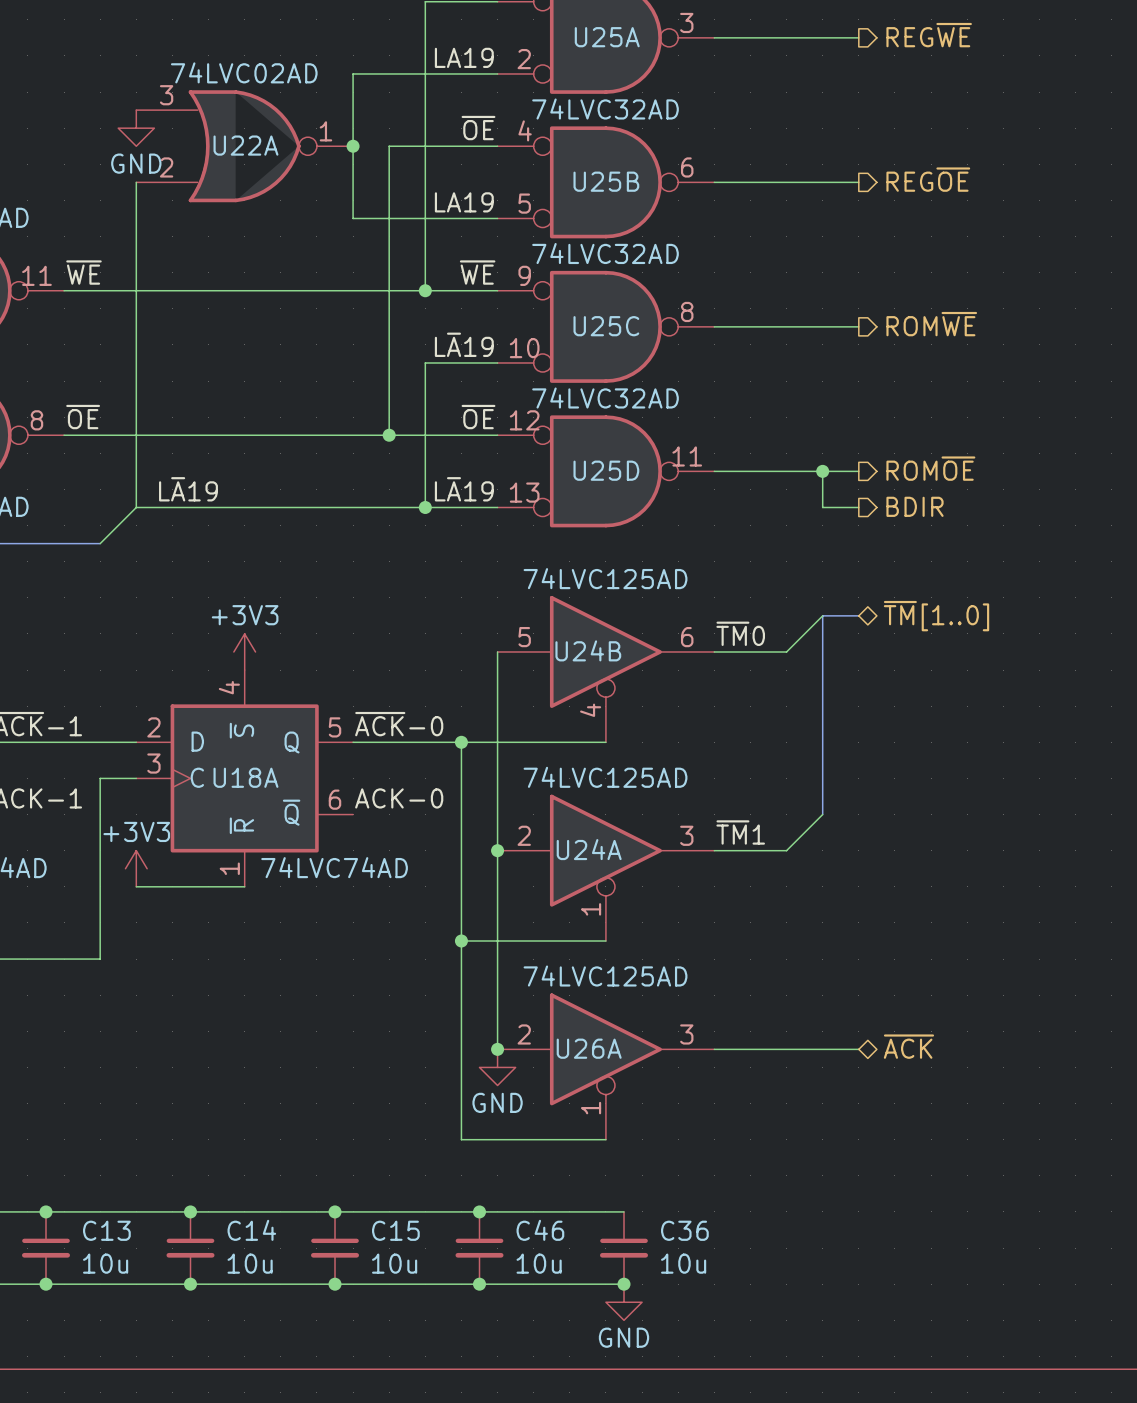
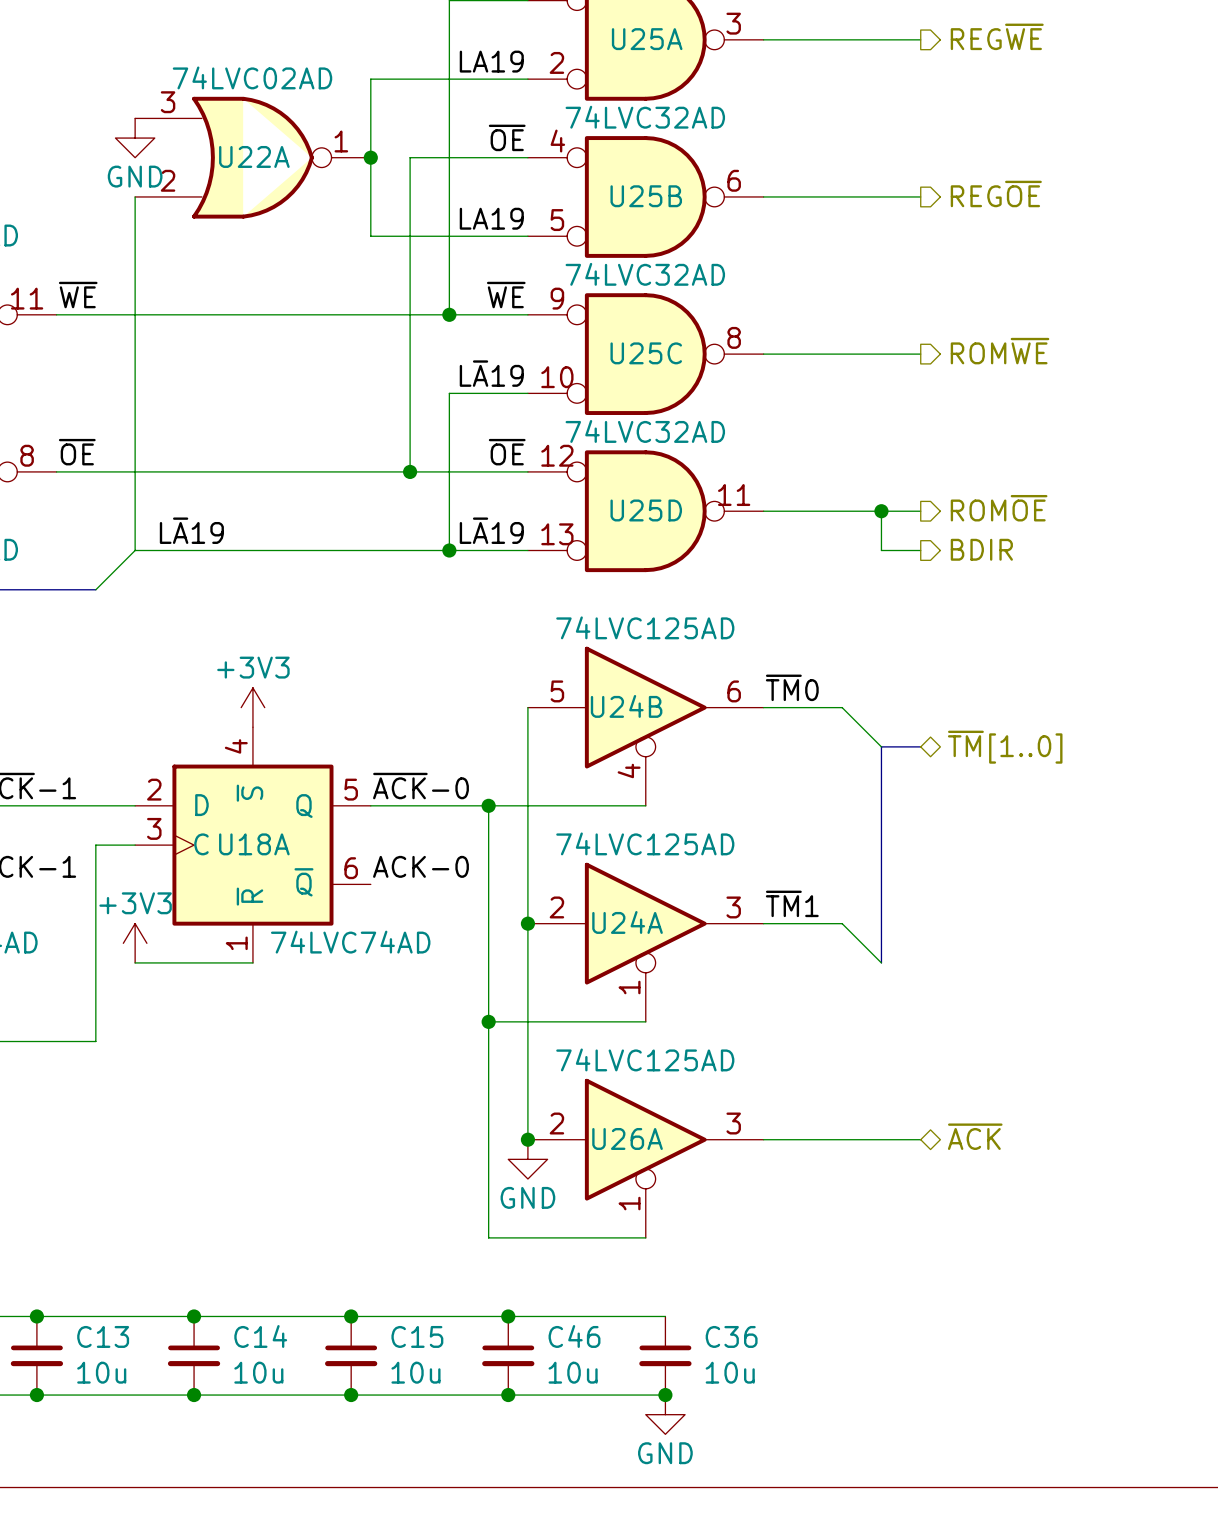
wire: (822, 615) (786, 651) -> (881, 746) (842, 707)
bus: (858, 615) (822, 615) (822, 688) -> (920, 746) (881, 746)
hierarchical label position: ~{TM}[1..0] (936, 616) -> ~{TM}[1..0] (1005, 747)
wire: (822, 814) (786, 850) -> (881, 962) (842, 923)
bus: none -> (881, 884) (881, 962)

